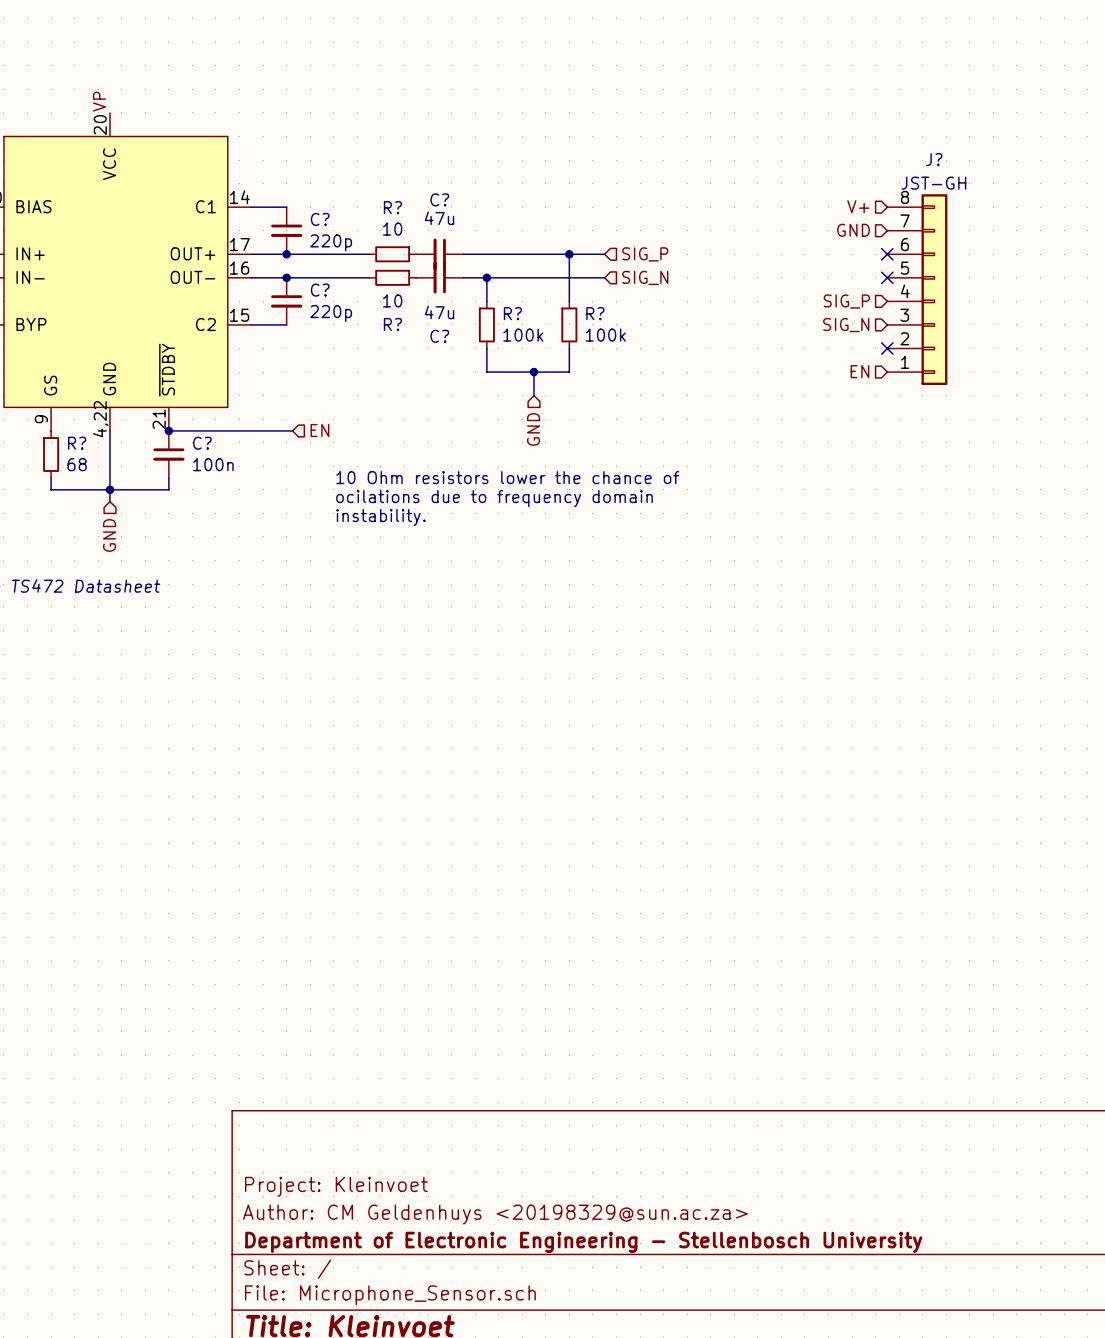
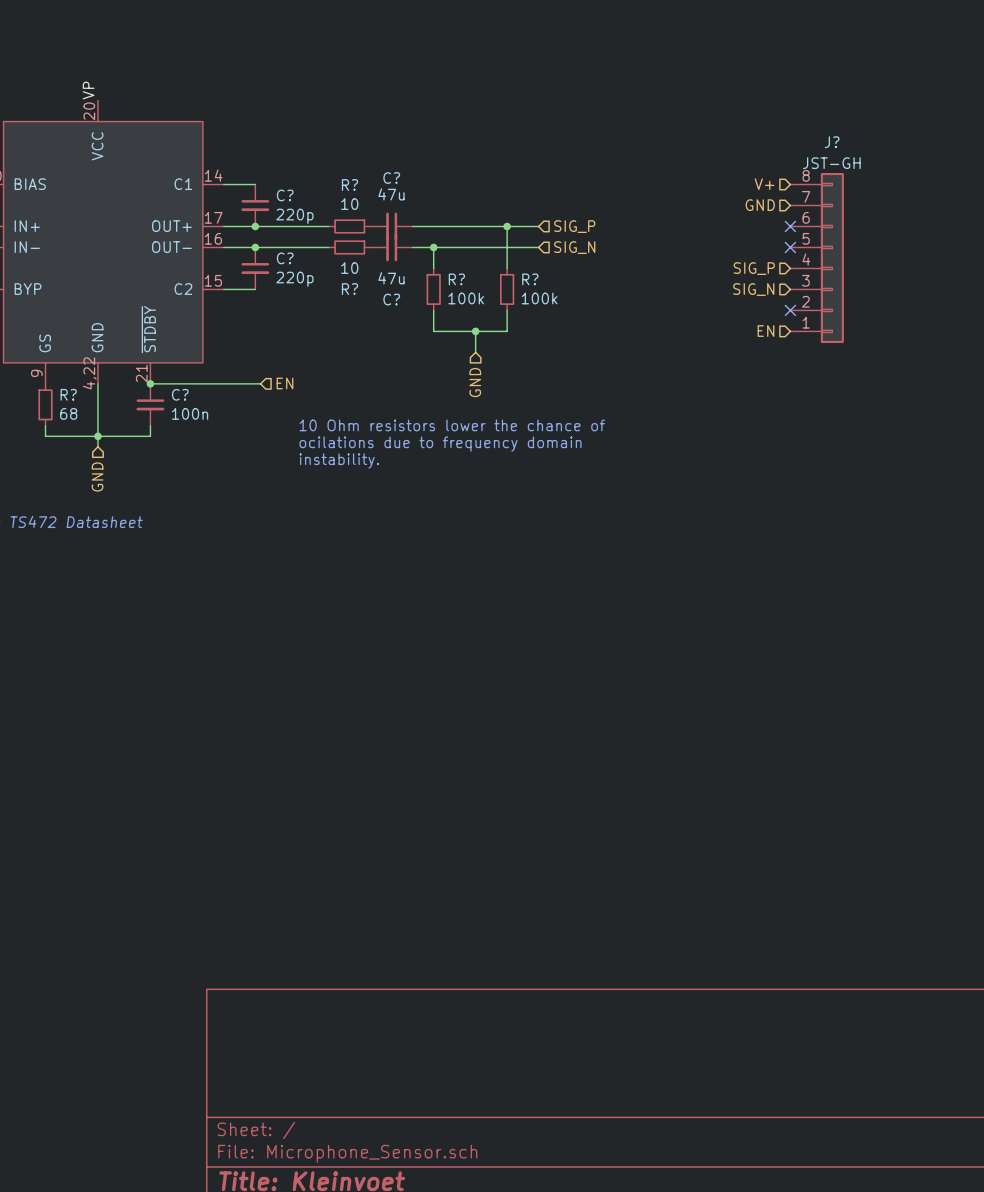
title block: Project: Kleinvoet (336, 1186) -> none
title block: Author: CM Geldenhuys <20198329@sun.ac.za> (495, 1214) -> none
title block: Department of Electronic Engineering - Stellenbosch University (583, 1242) -> none

